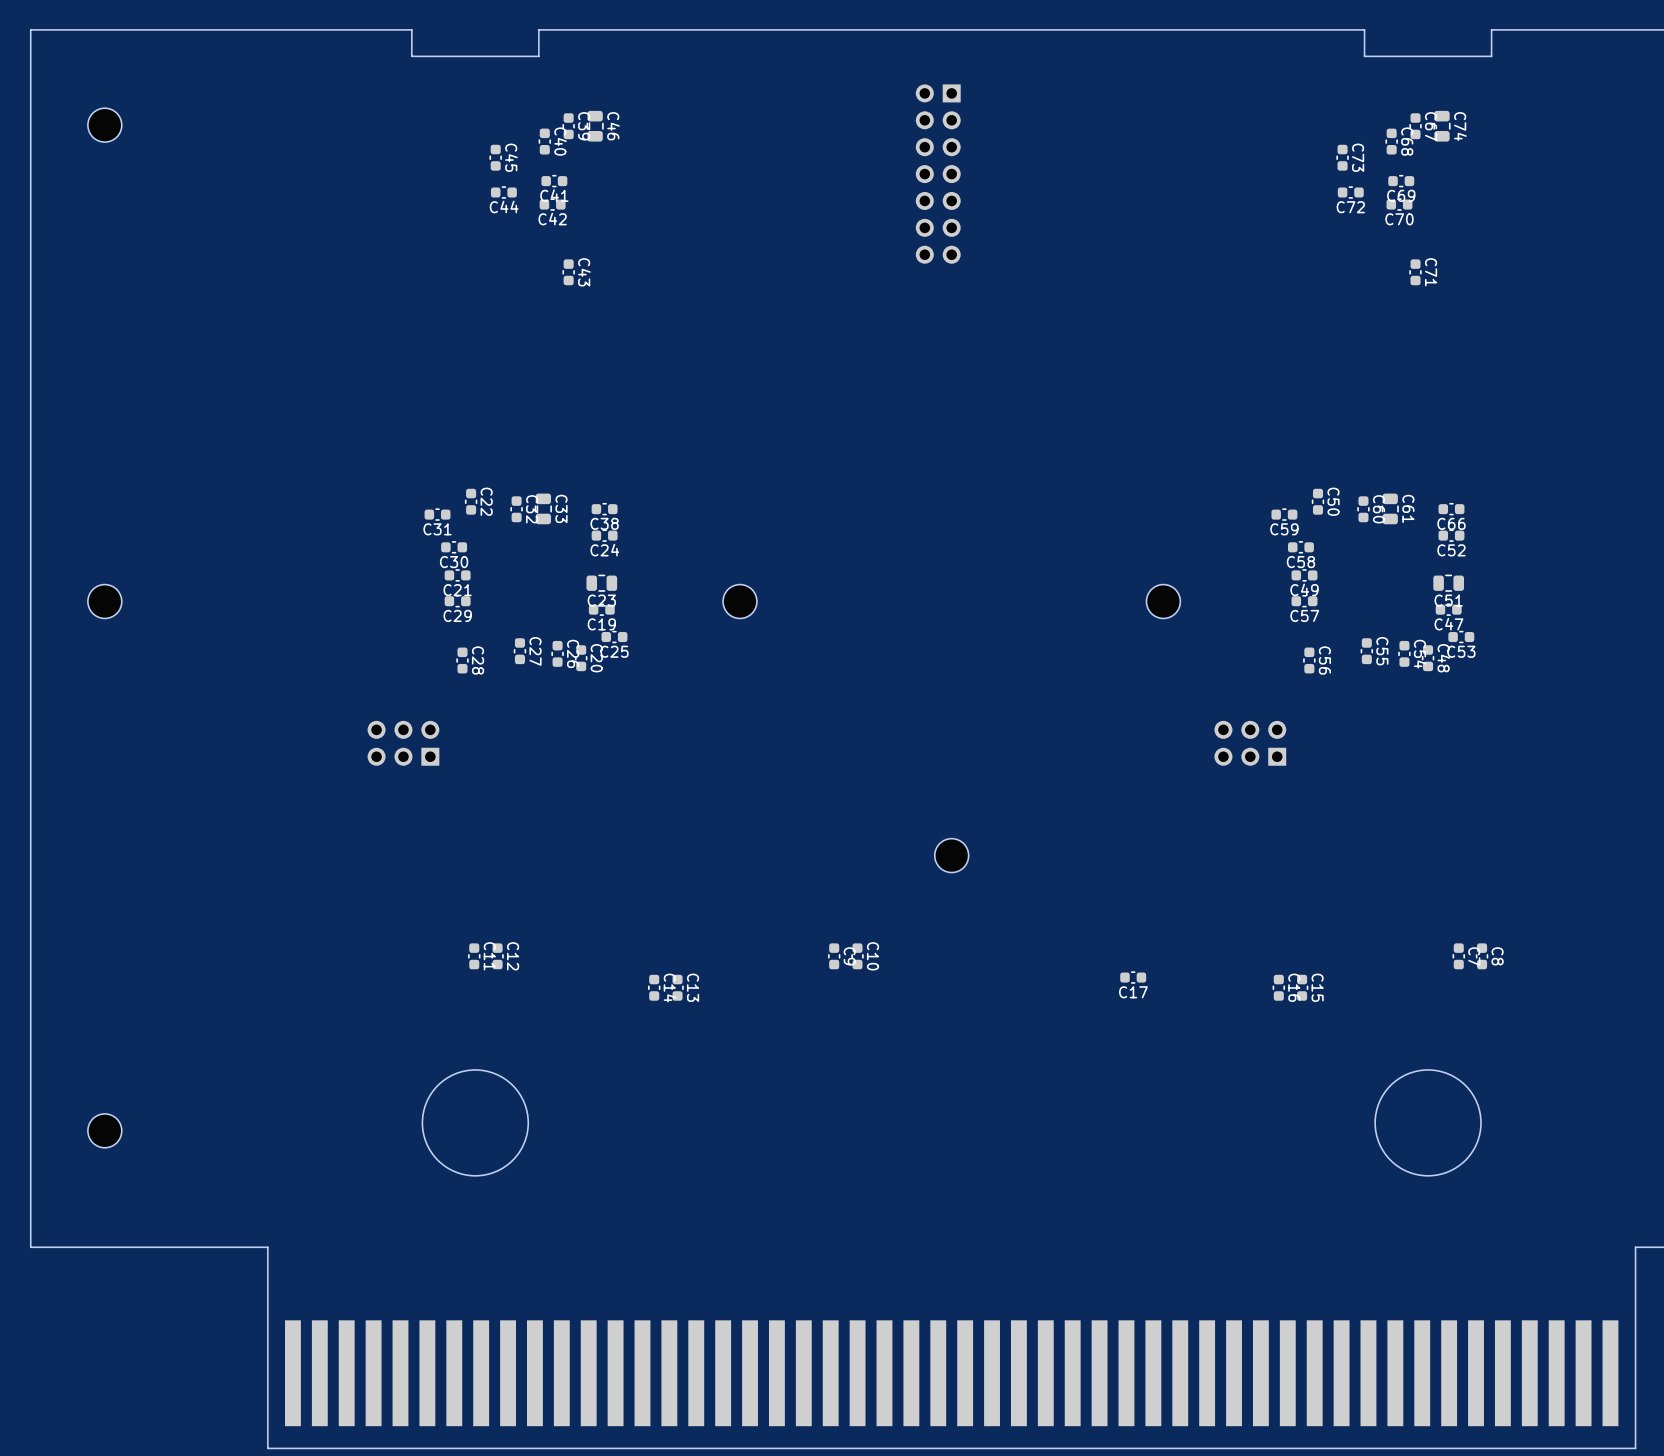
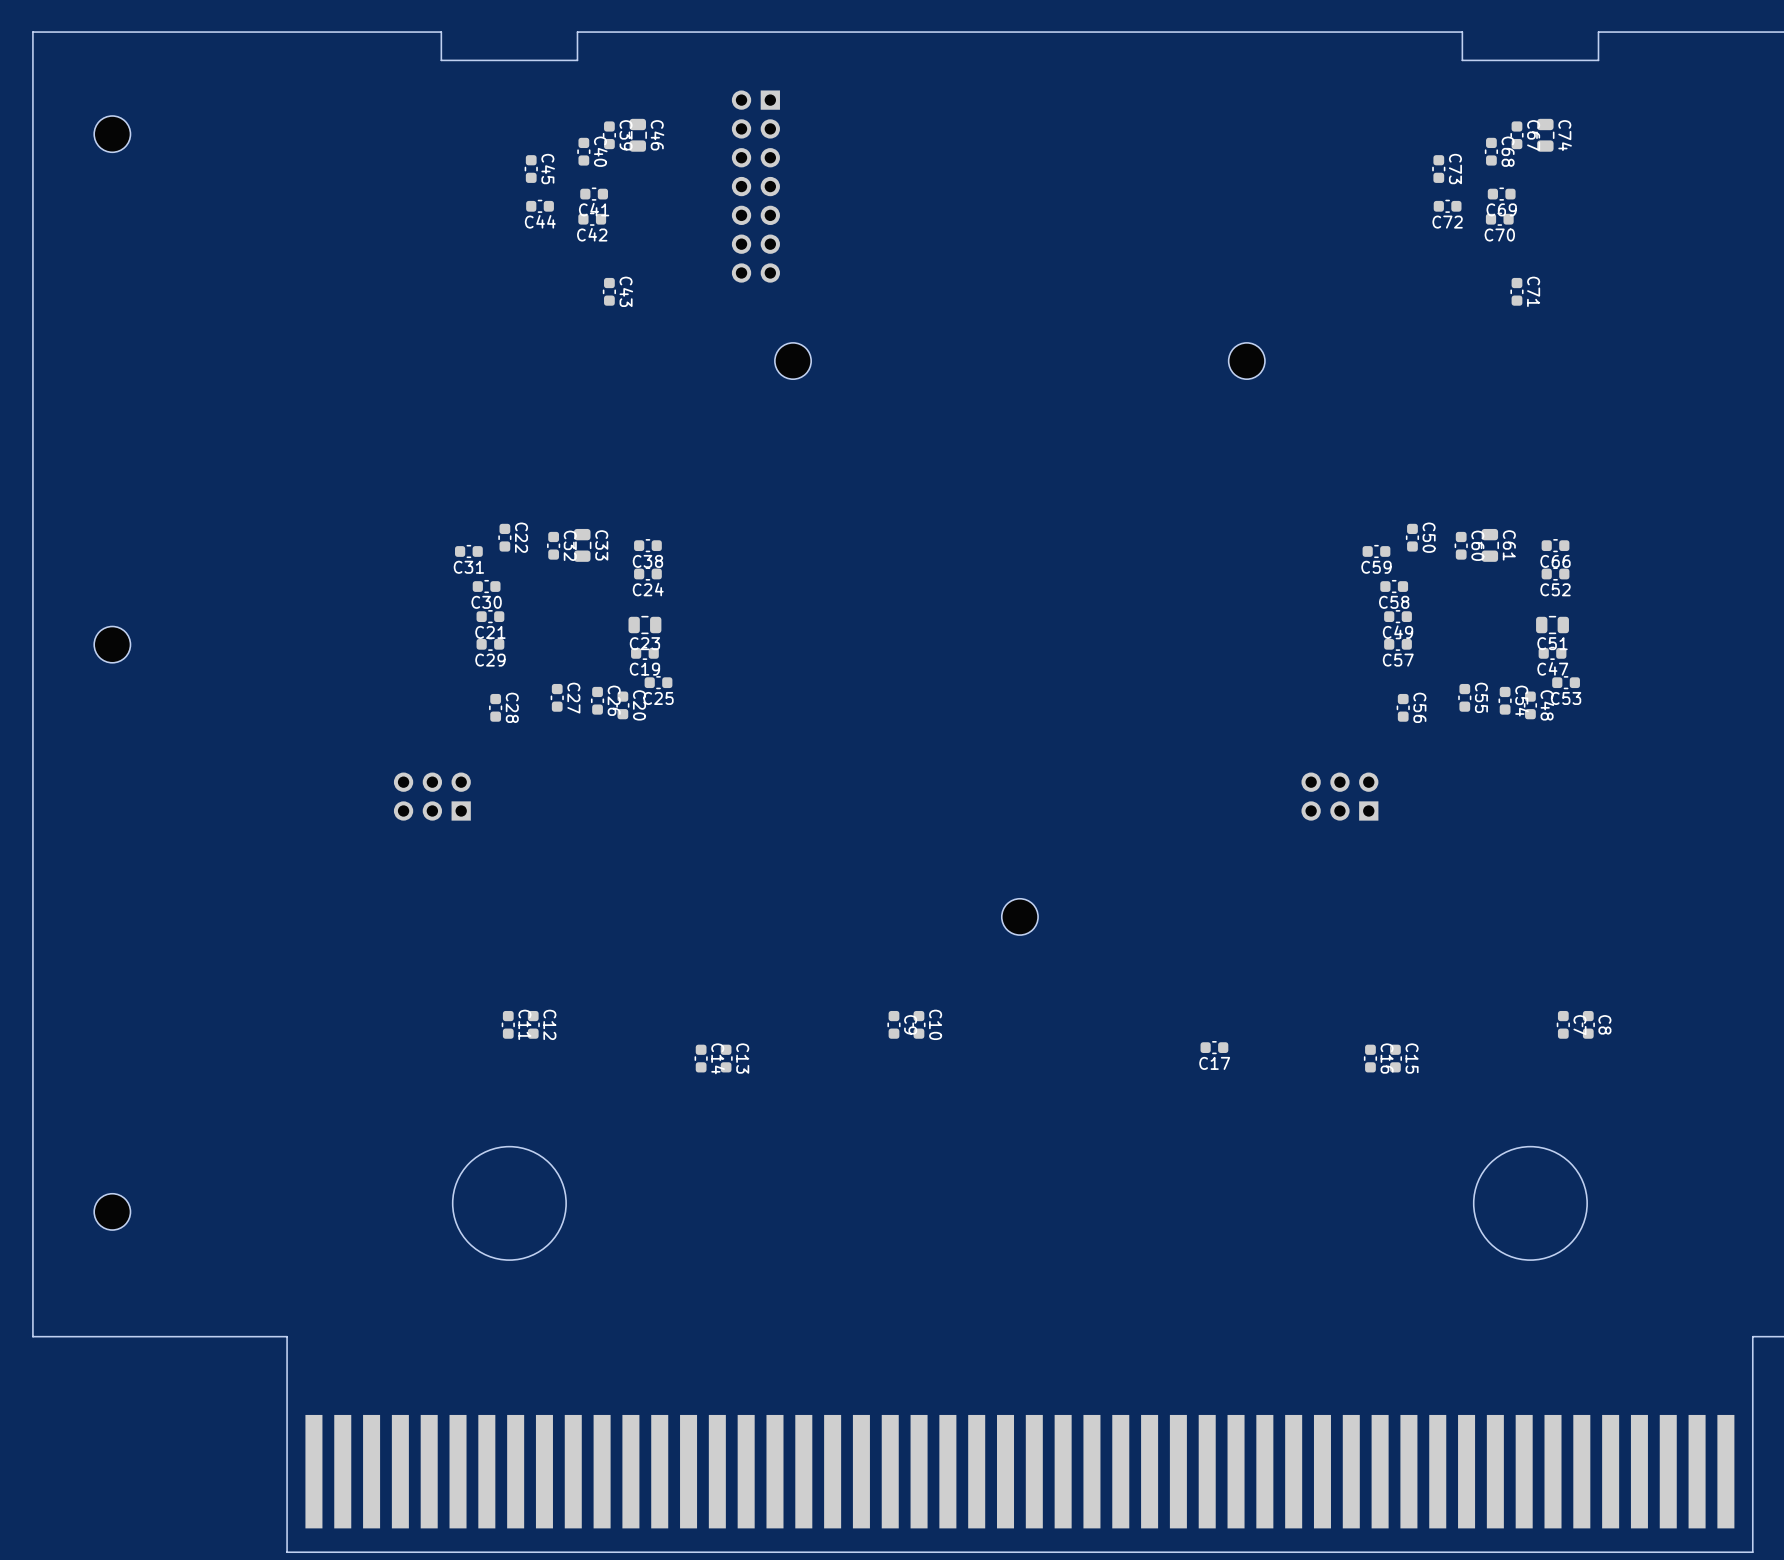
part position: (938, 174) -> (755, 186)
part: none -> (793, 361)
part: none -> (1246, 361)
part: (739, 601) -> none
part: (1163, 601) -> none

